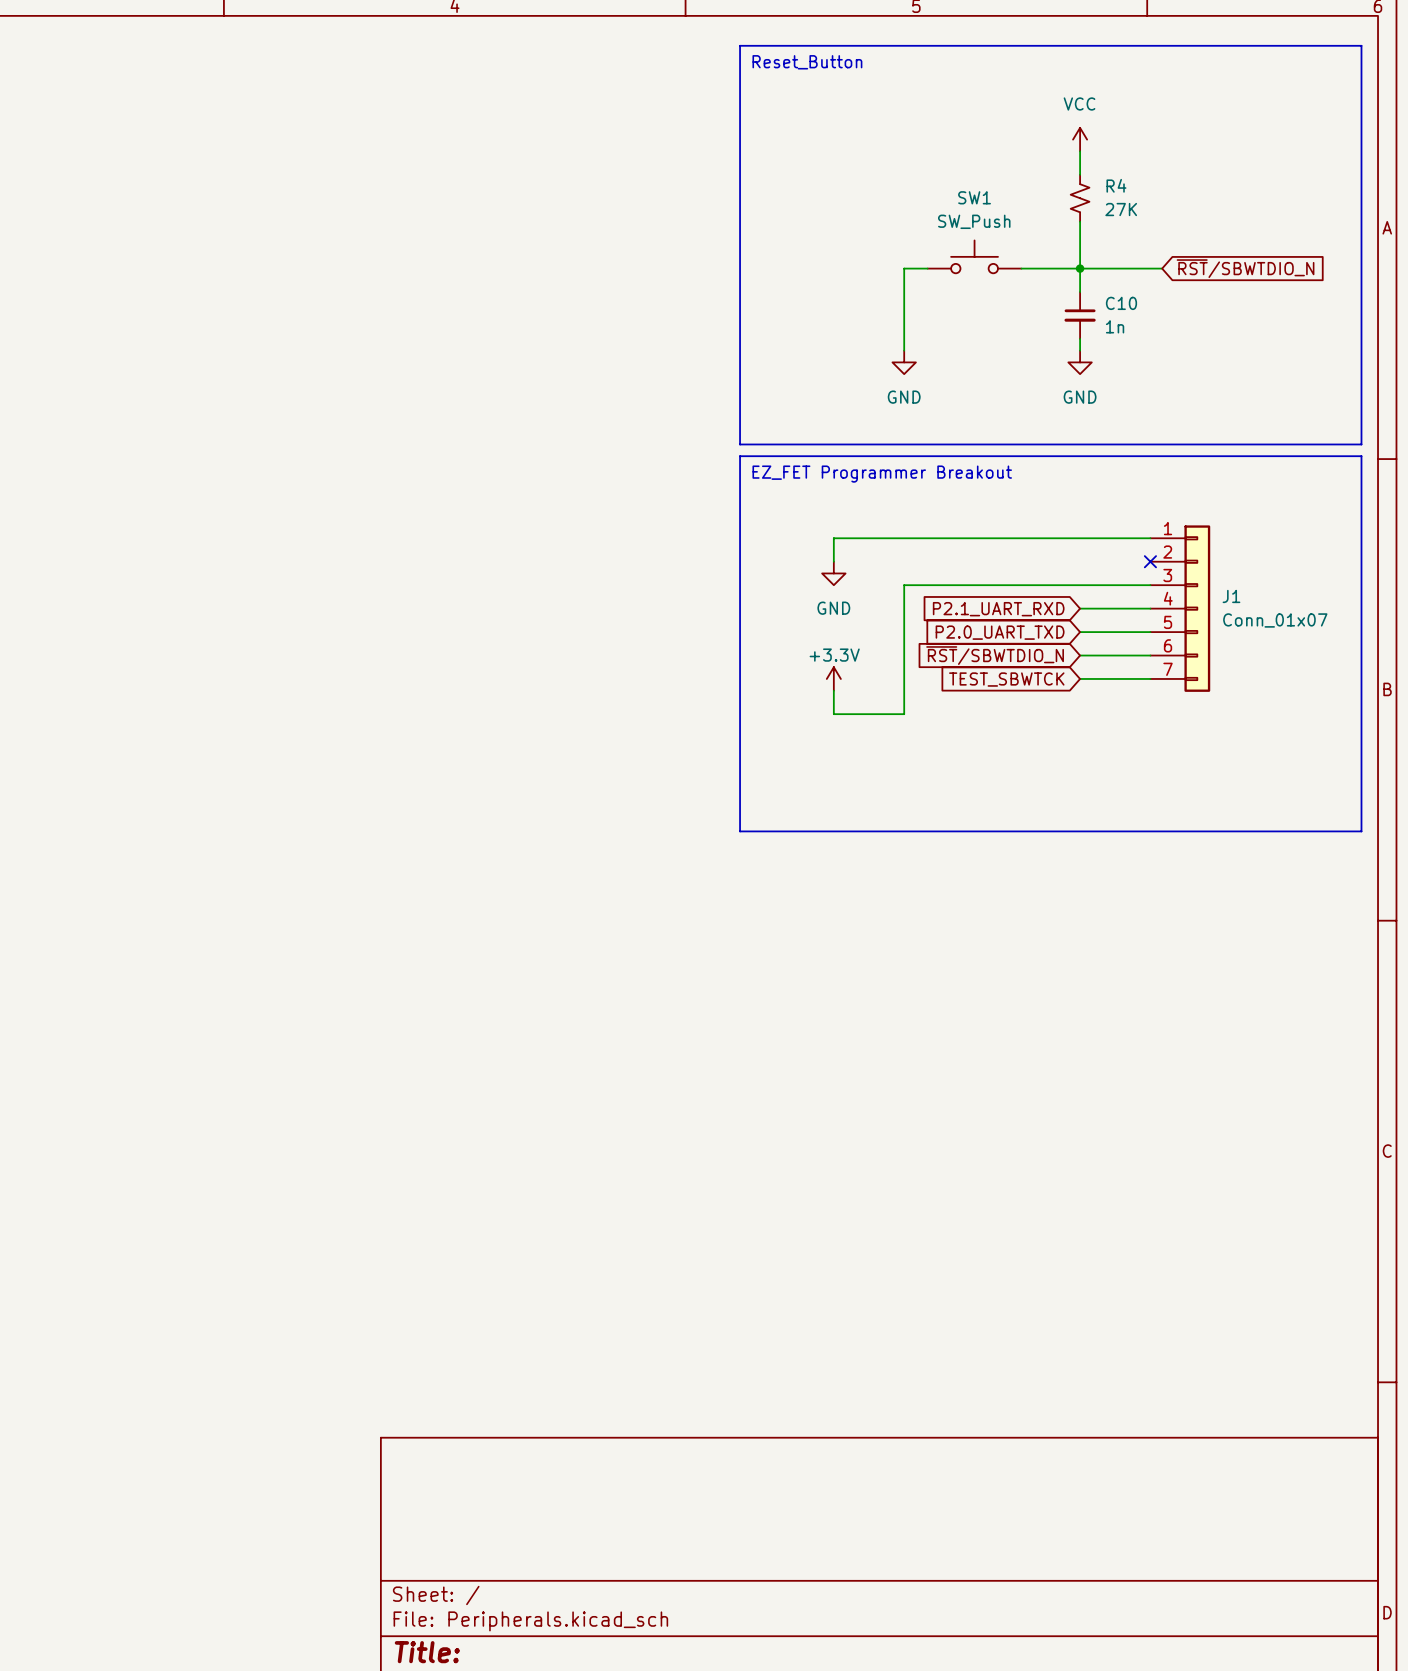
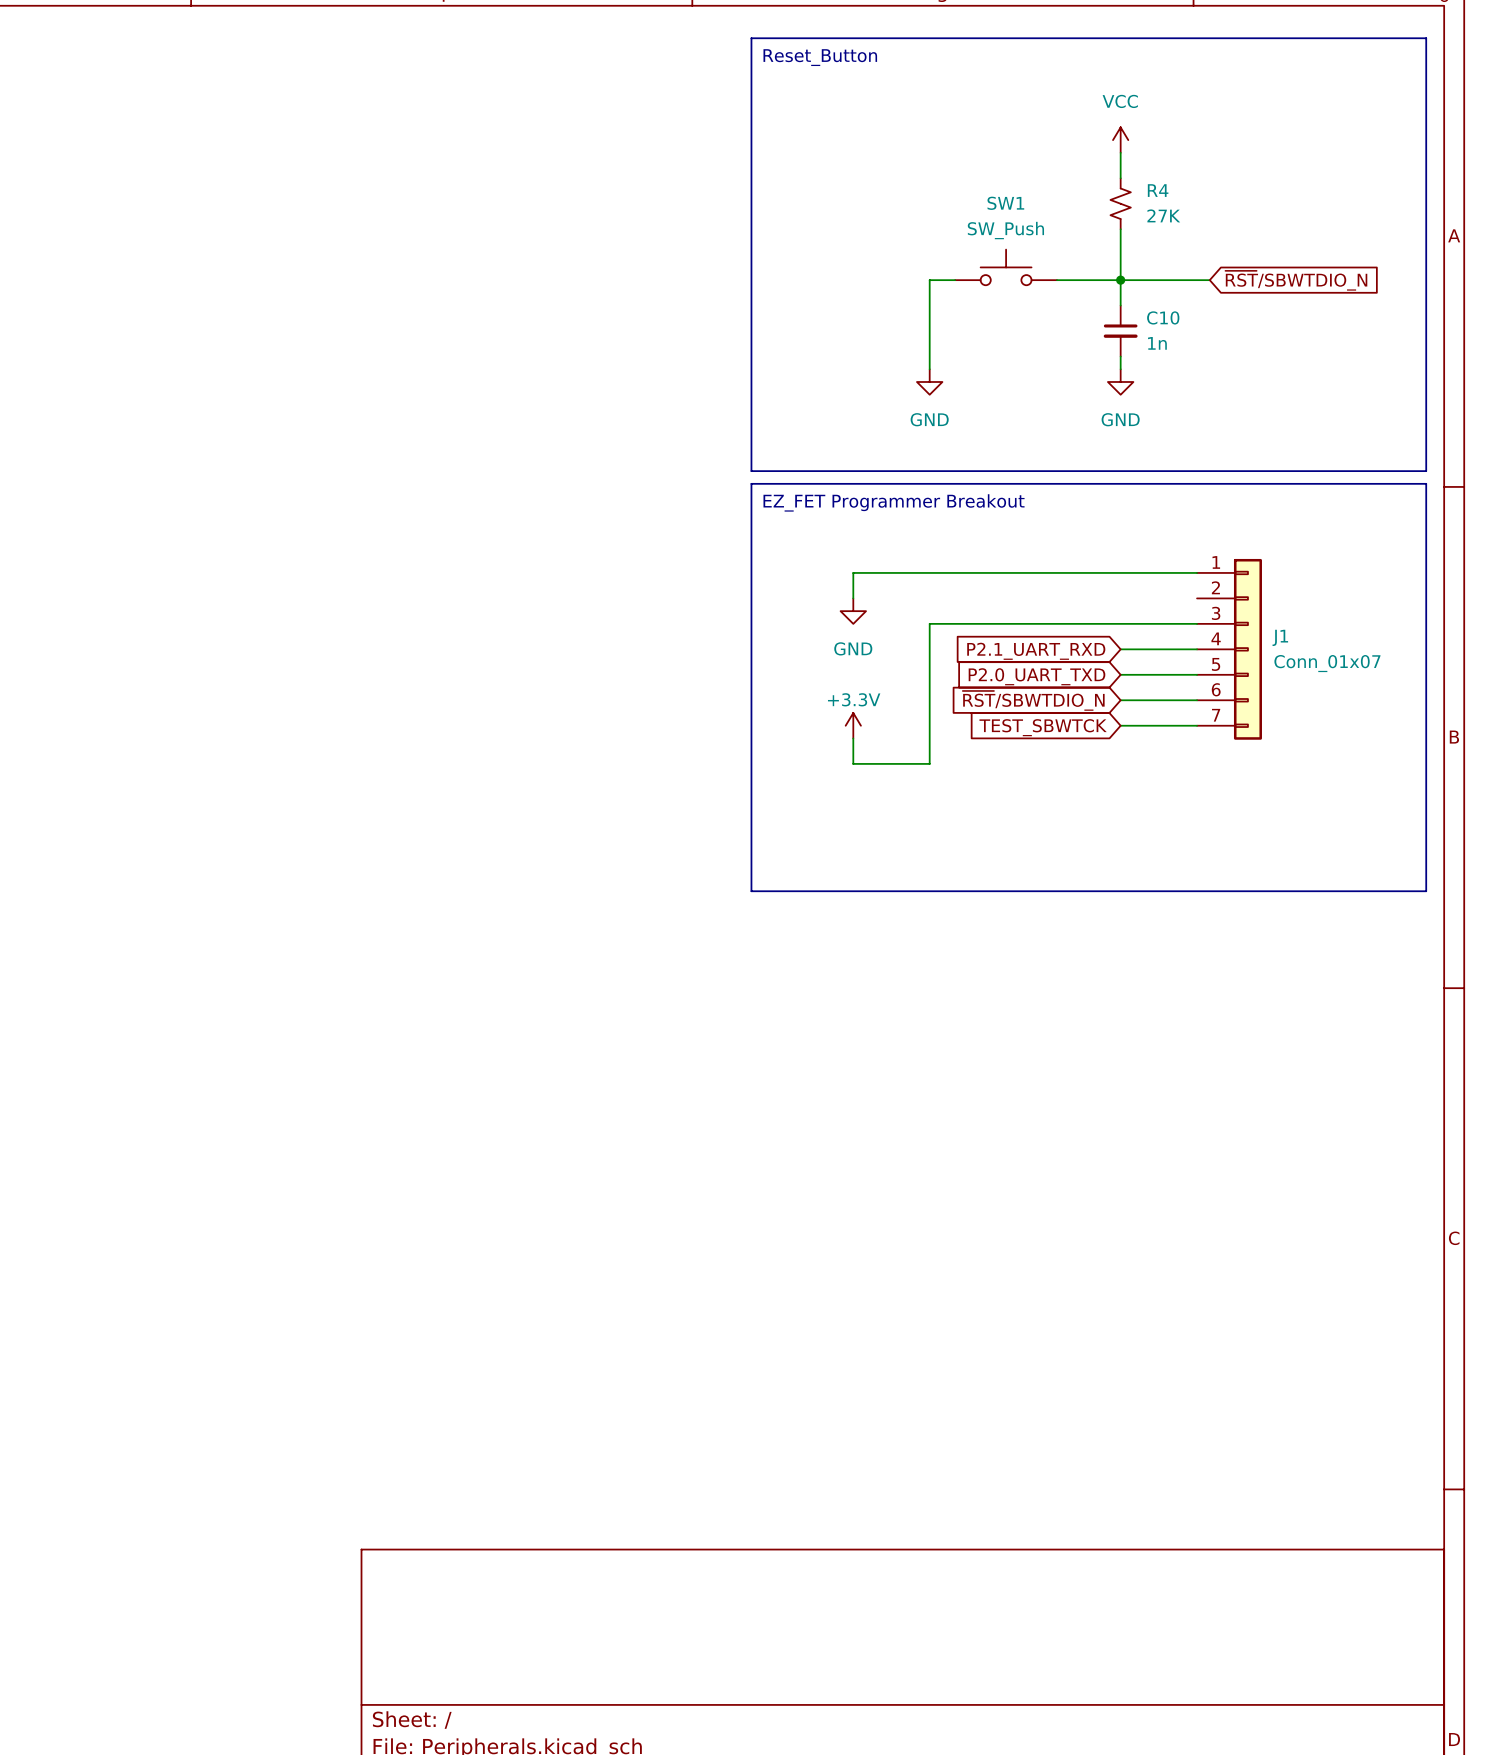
no-connect mark: (1150, 561) -> none

